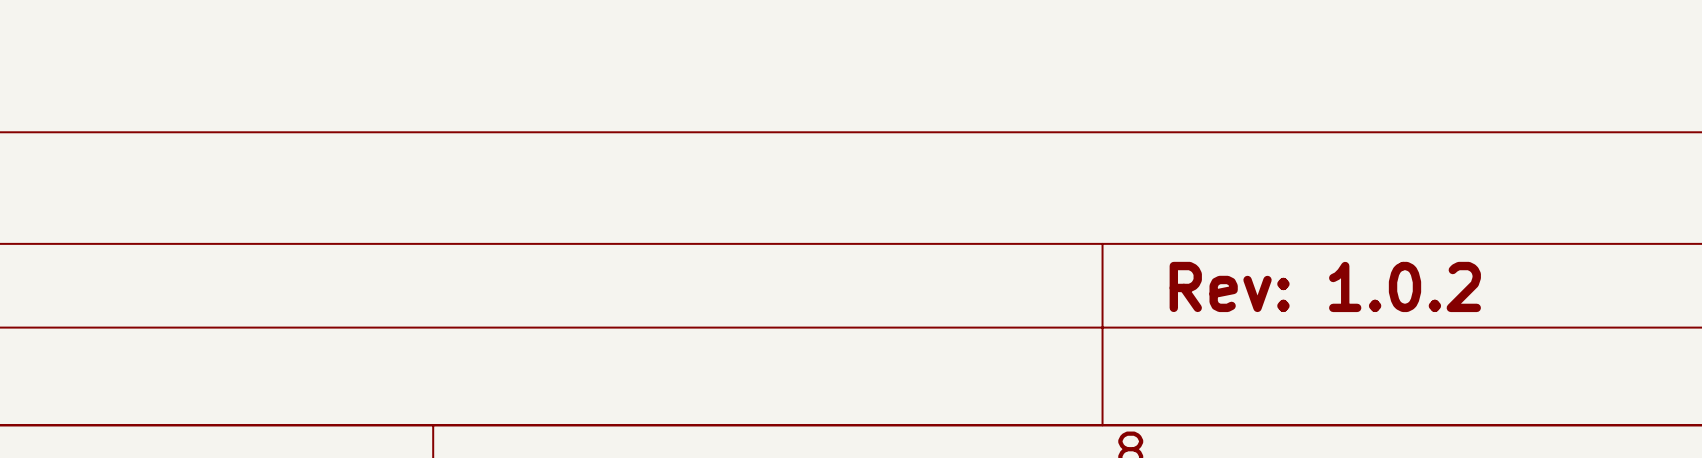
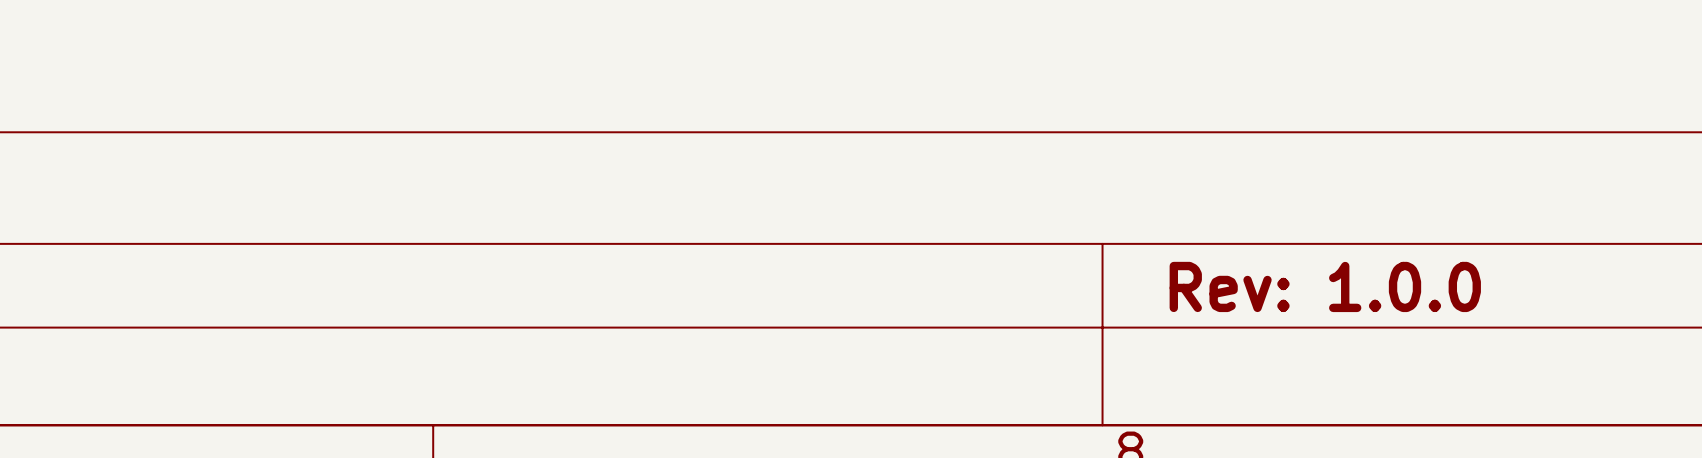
title block: Rev: 1.0.2 (1325, 286) -> Rev: 1.0.0 (1325, 286)

